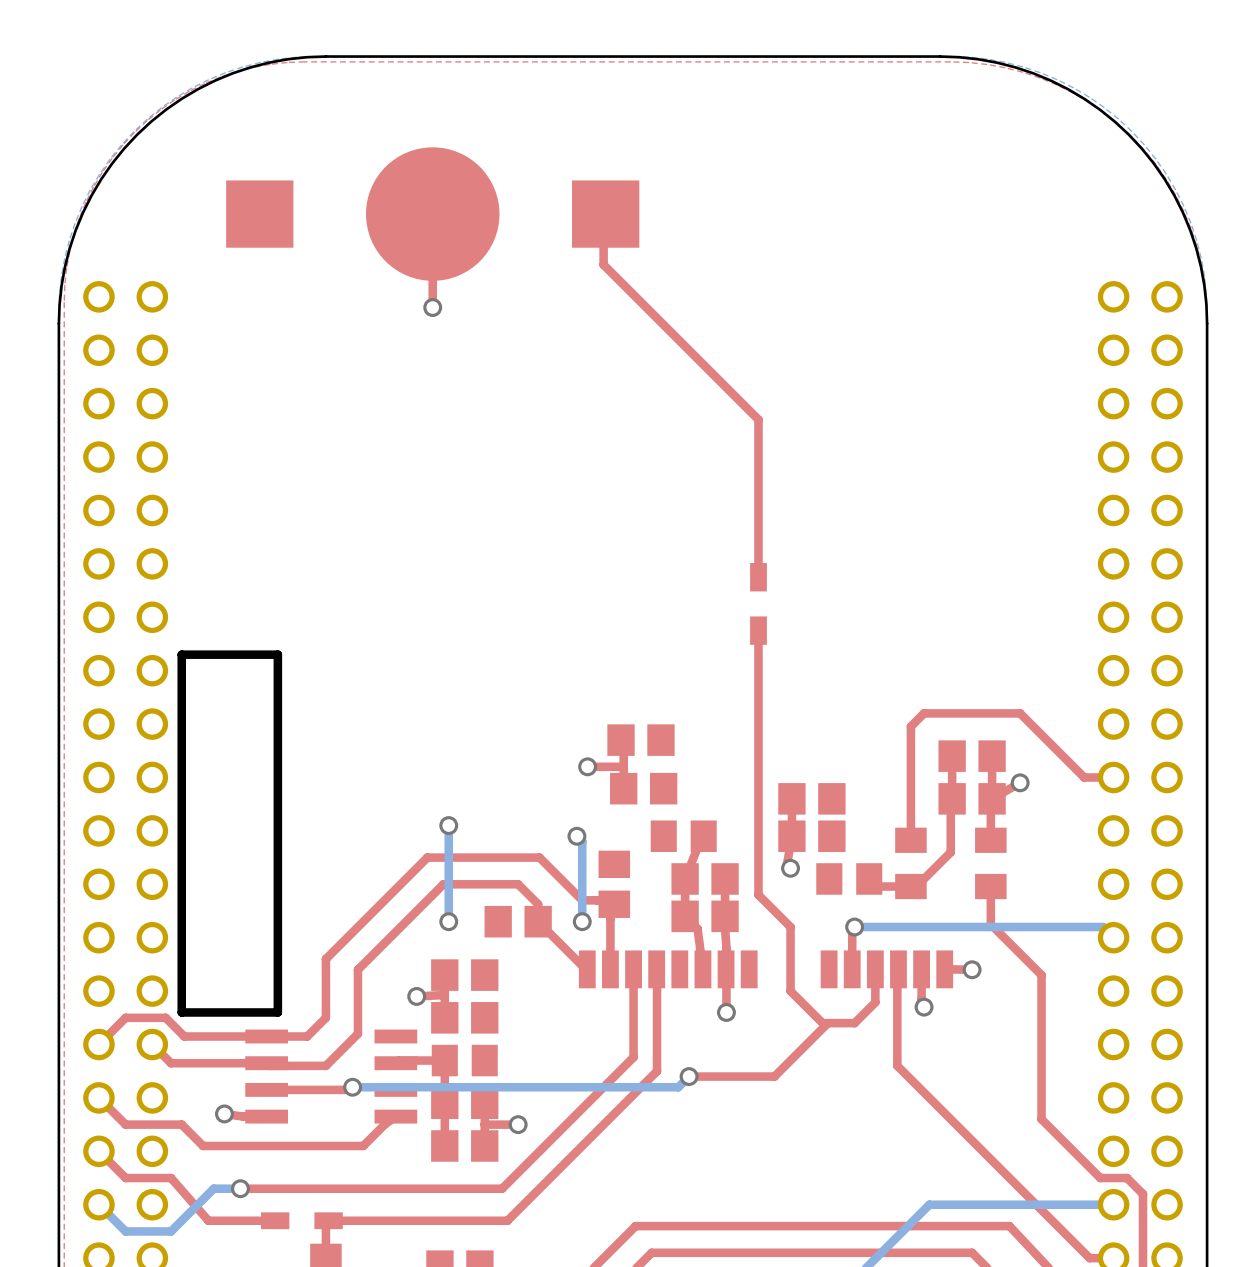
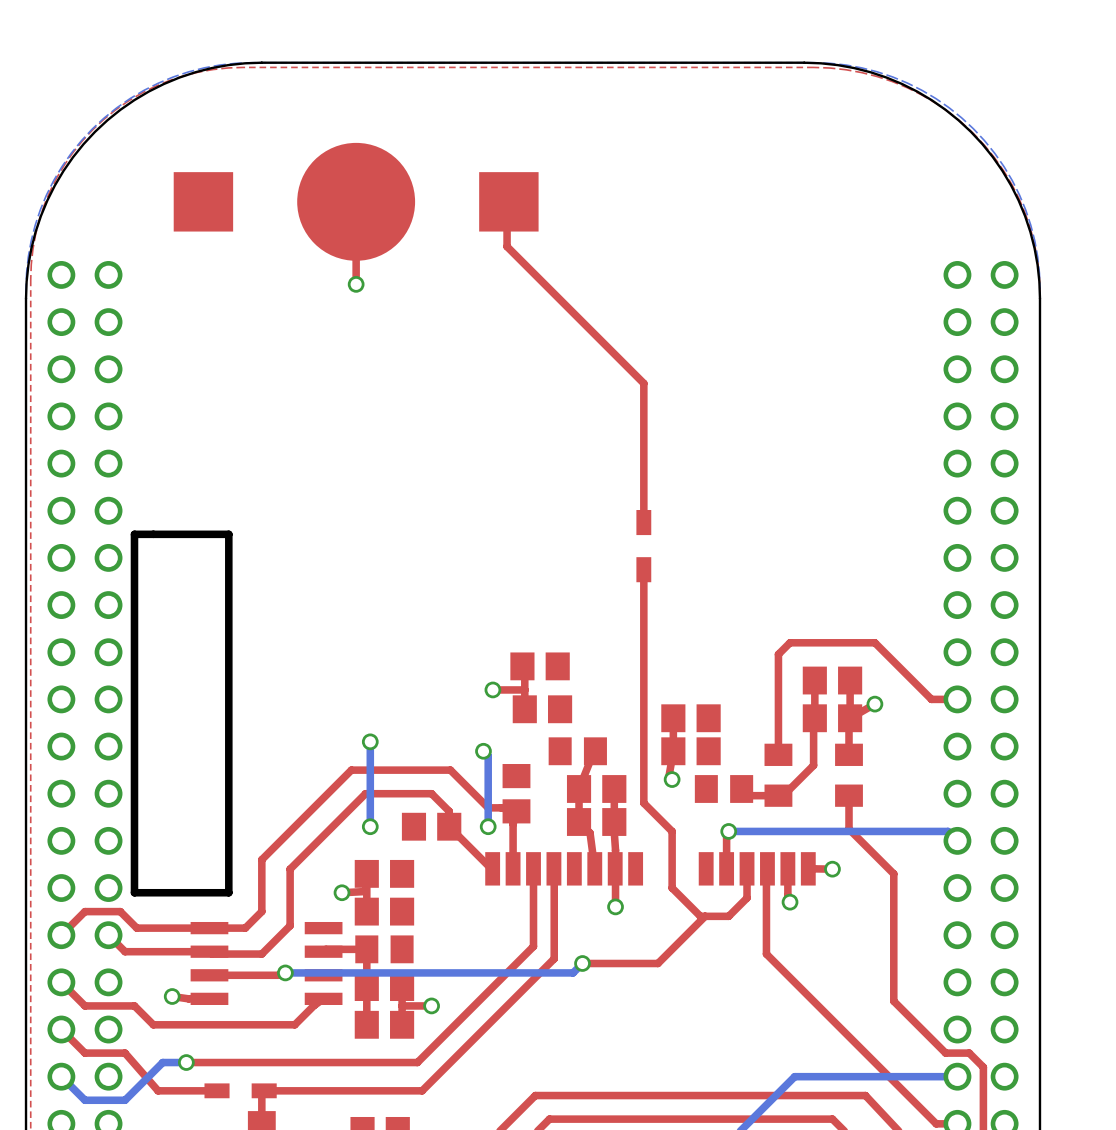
board edge: (181, 654) (277, 654) (277, 1012) (181, 1012) (181, 996) -> (134, 590) (134, 534) (228, 534) (228, 892) (134, 892)

